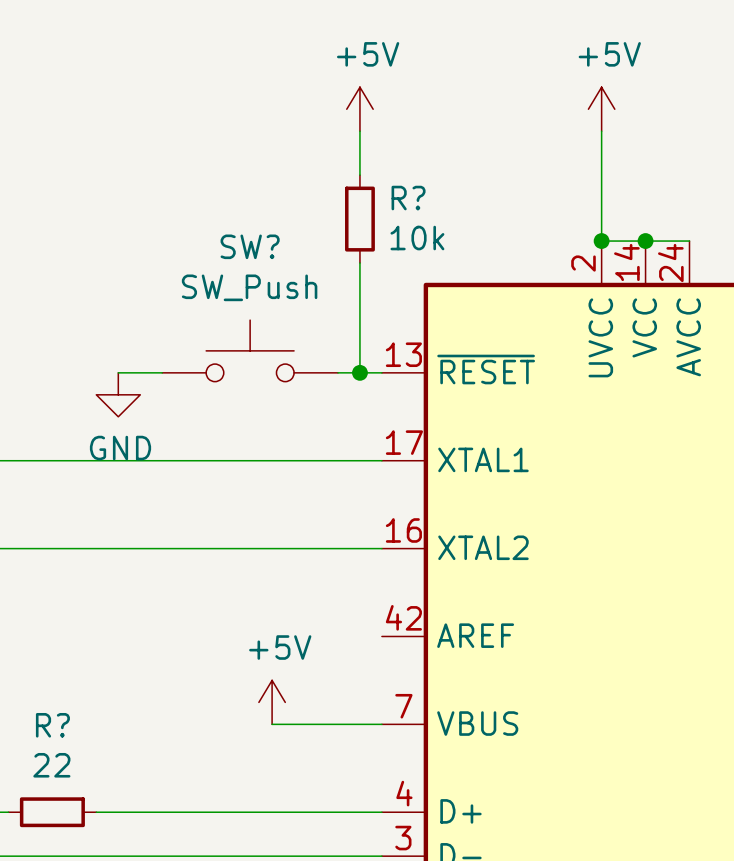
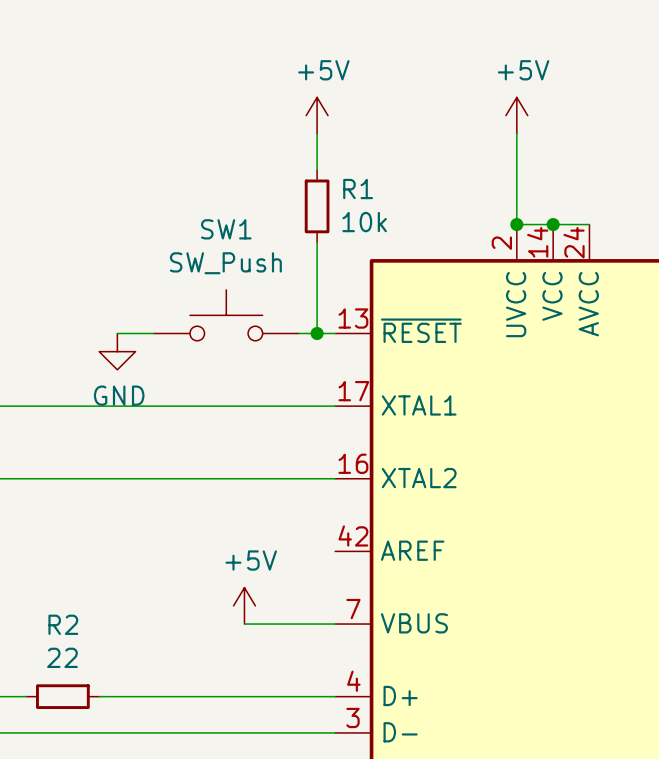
R? name: R? (408, 198) -> R1 (358, 189)
SW? name: SW? (250, 246) -> SW1 (226, 229)
R? name: R? (52, 725) -> R2 (63, 624)

